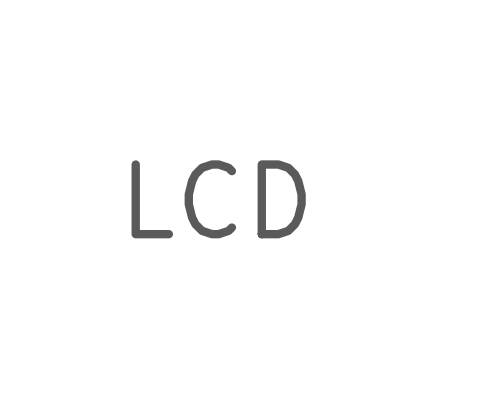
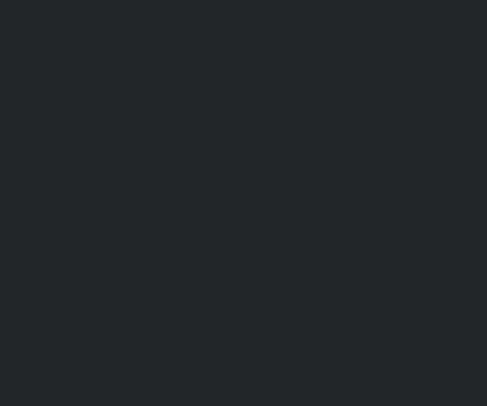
text: LCD (218, 199) -> none

